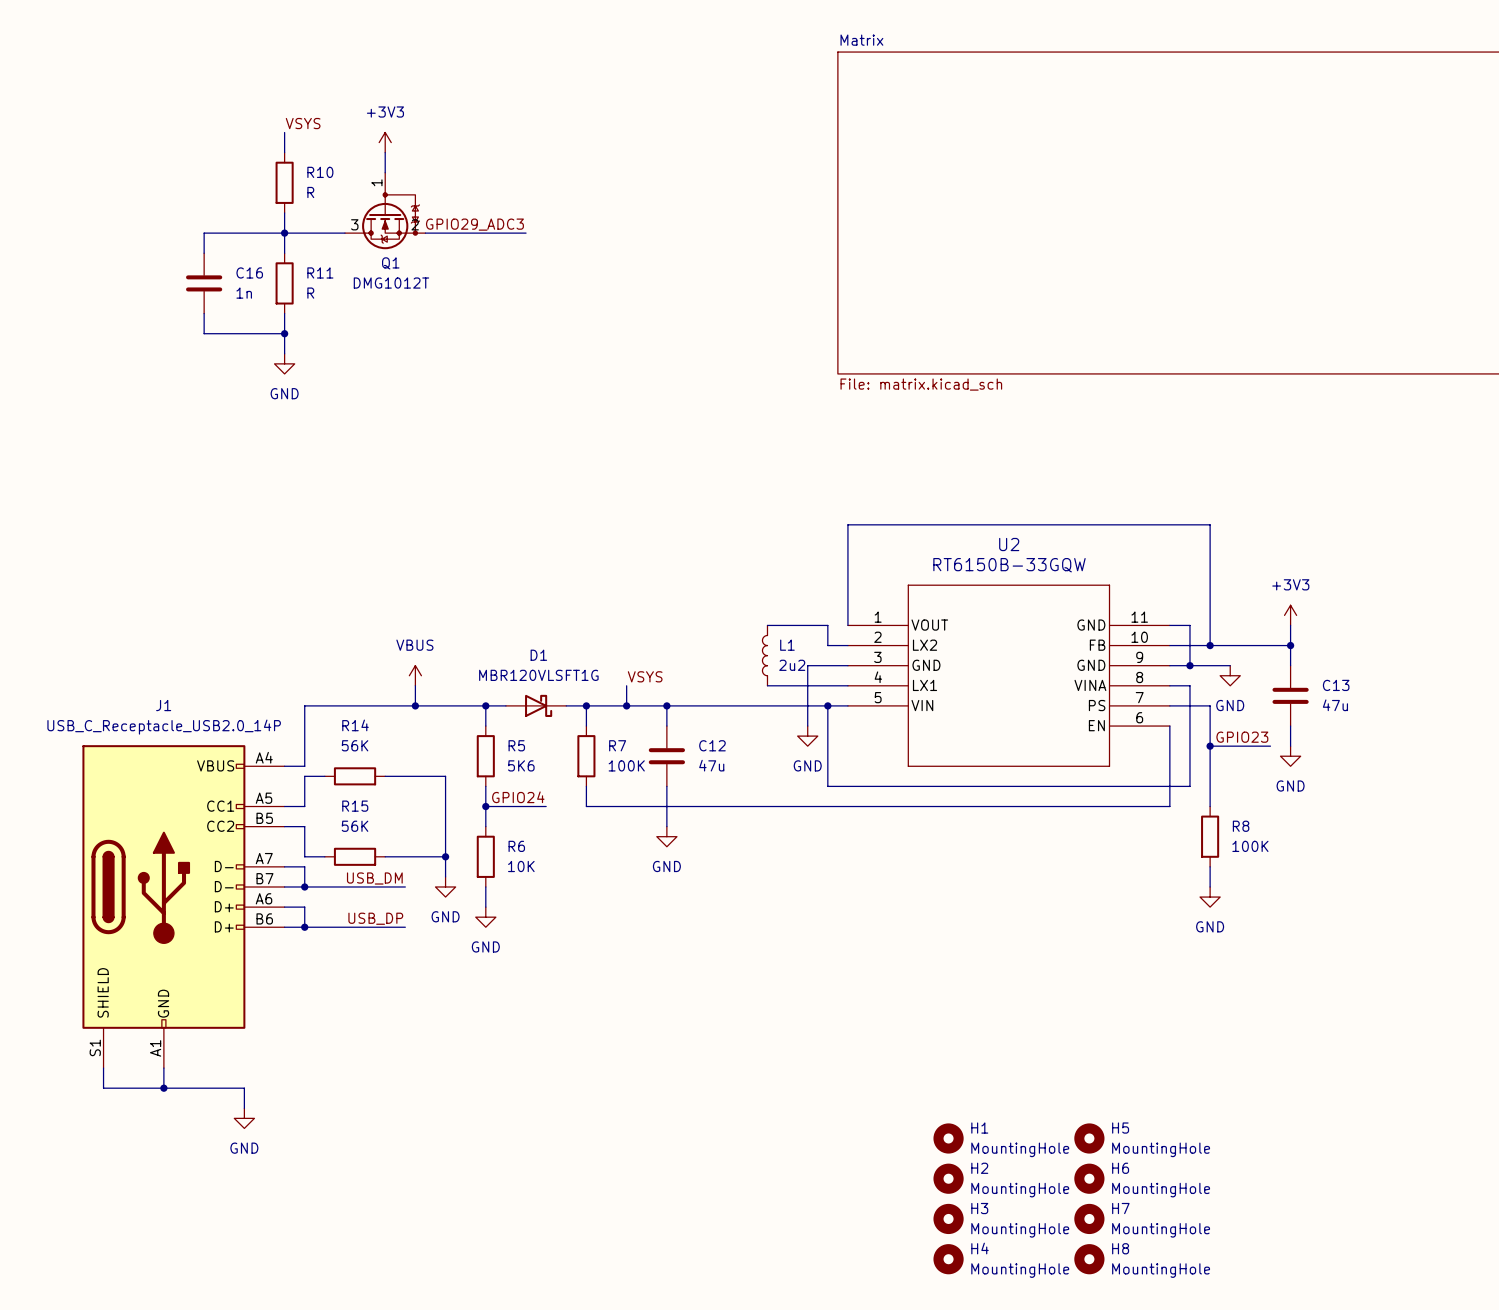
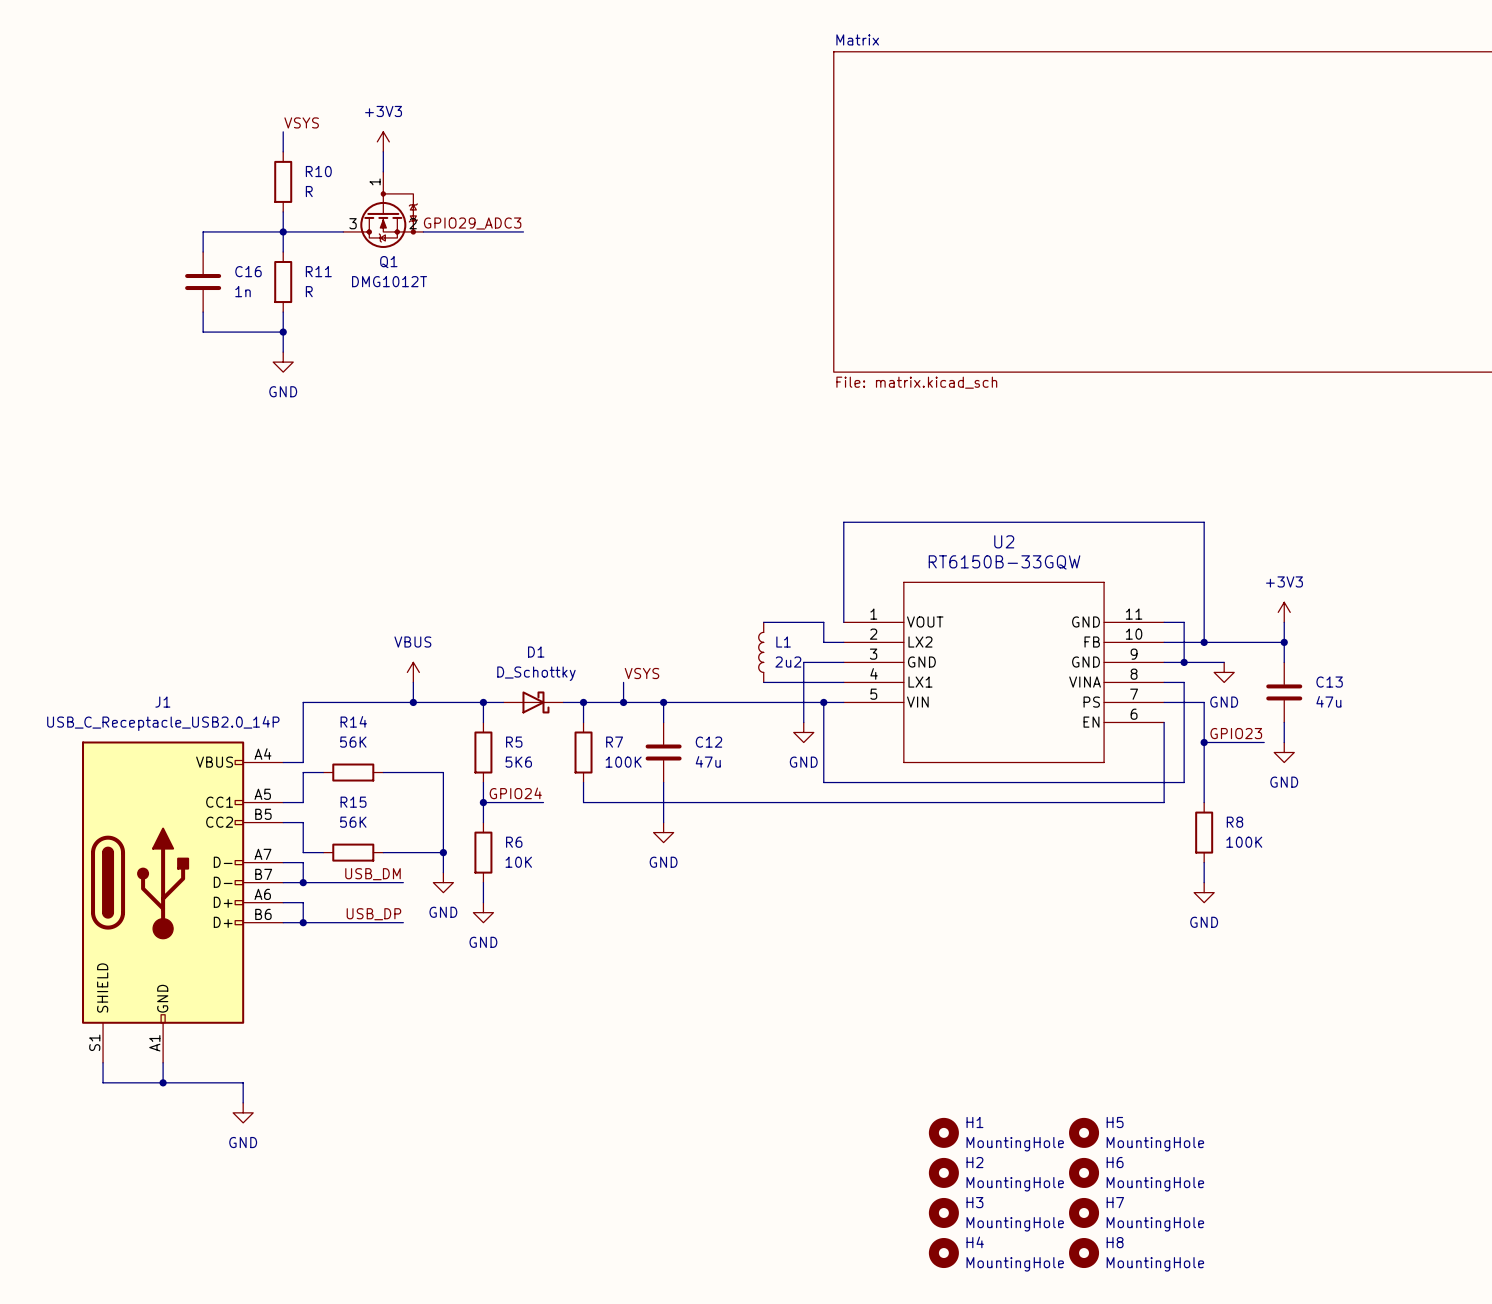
D1 value: MBR120VLSFT1G (538, 675) -> D_Schottky (536, 673)

